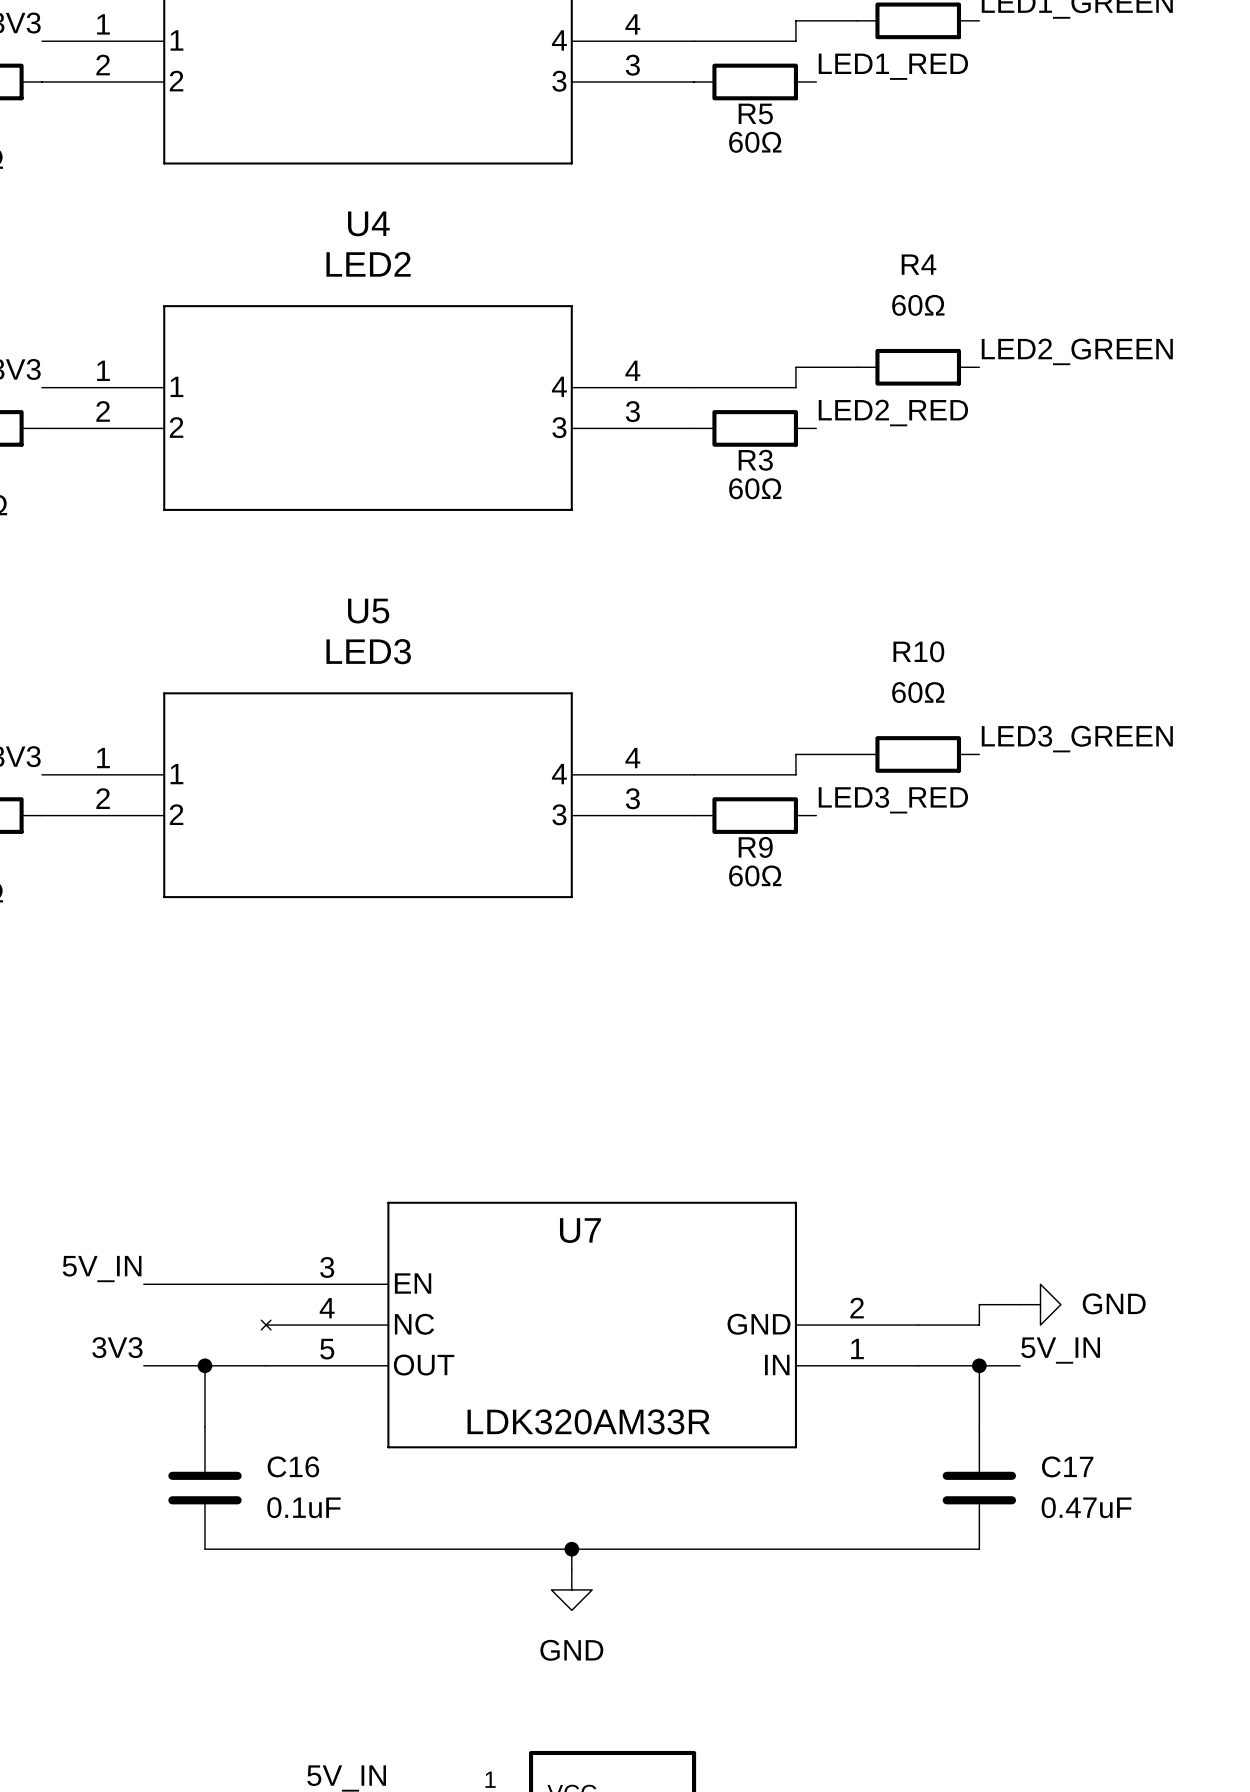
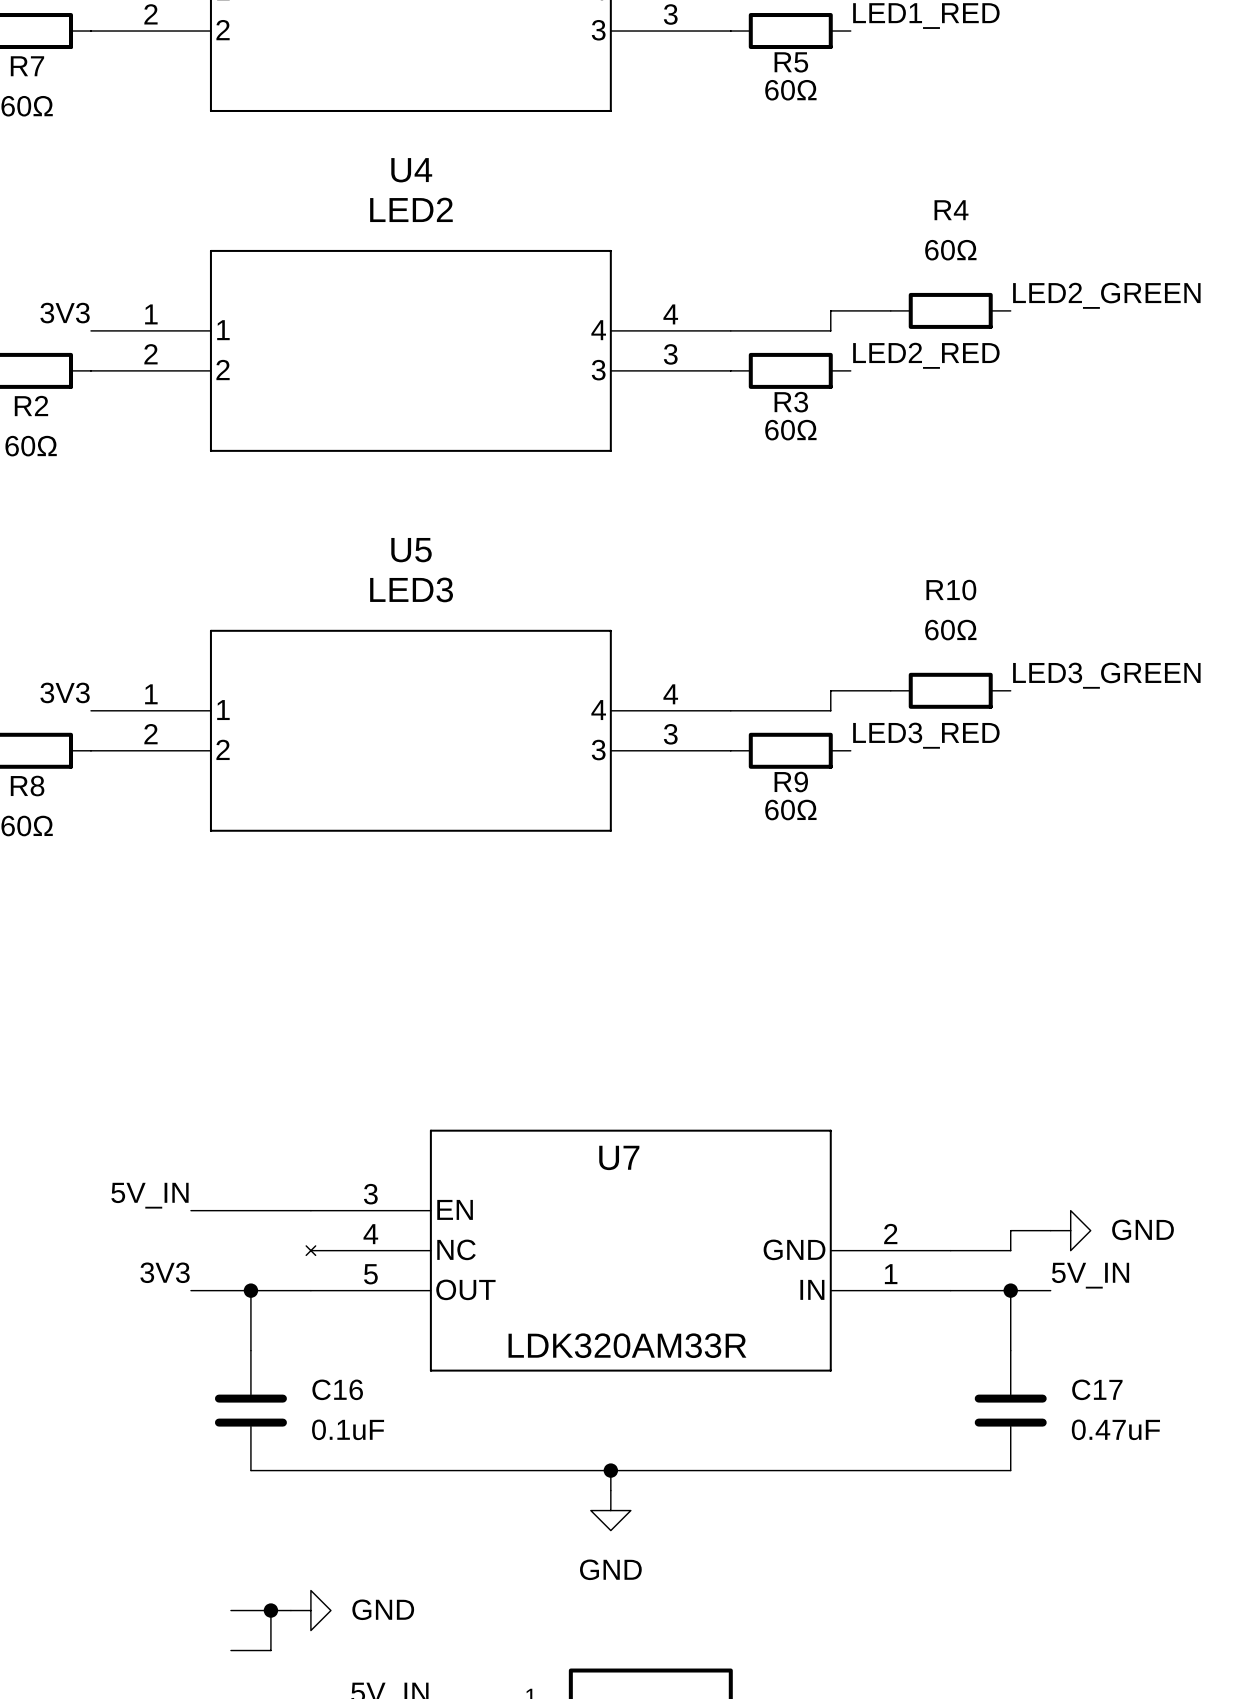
wire: none -> (230, 1610) (290, 1610)
wire: none -> (270, 1610) (270, 1650) (230, 1650)
junction: none -> (270, 1610)
power symbol: none -> GND (310, 1610)

